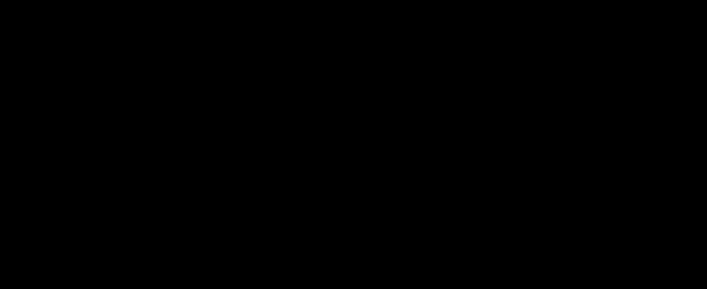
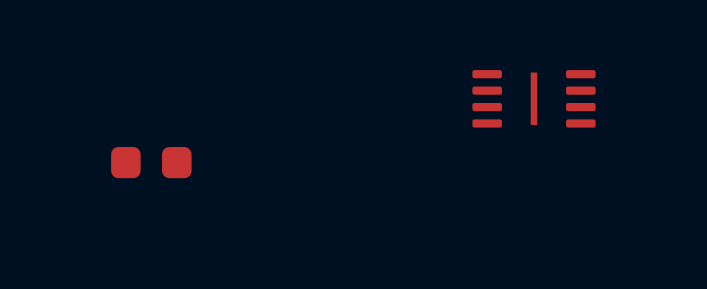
part: none -> (533, 98)
part: none -> (151, 162)

